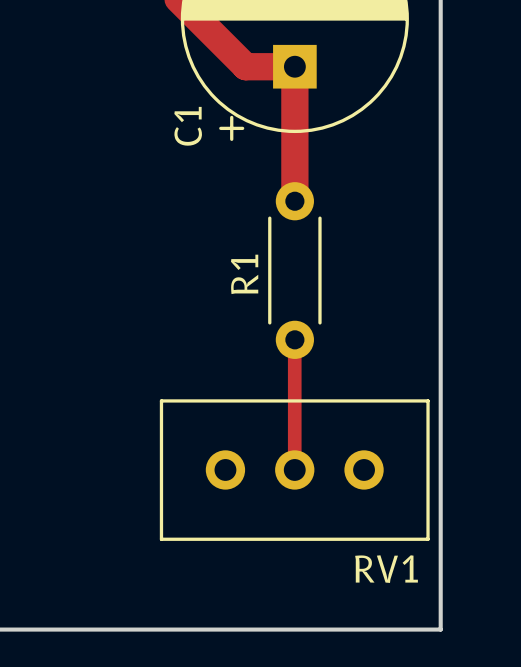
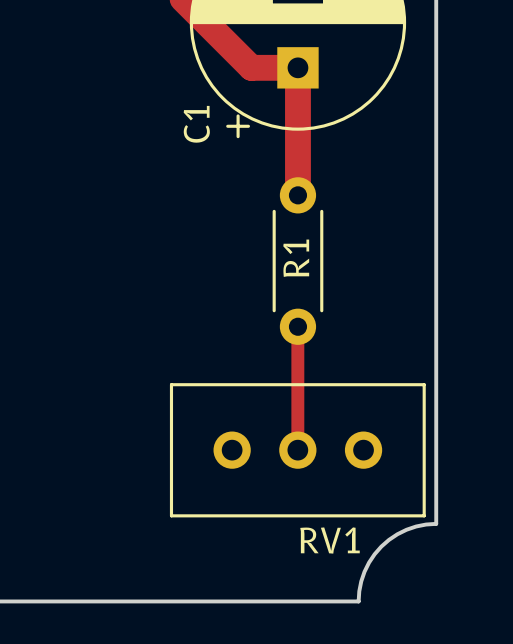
R1 name position: R1 (244, 274) -> R1 (296, 258)
board edge: (440, 547) (440, 629) (358, 629) -> (436, 523) (406, 529) (381, 546) (364, 571) (358, 601)
RV1 name position: RV1 (386, 569) -> RV1 (330, 540)

